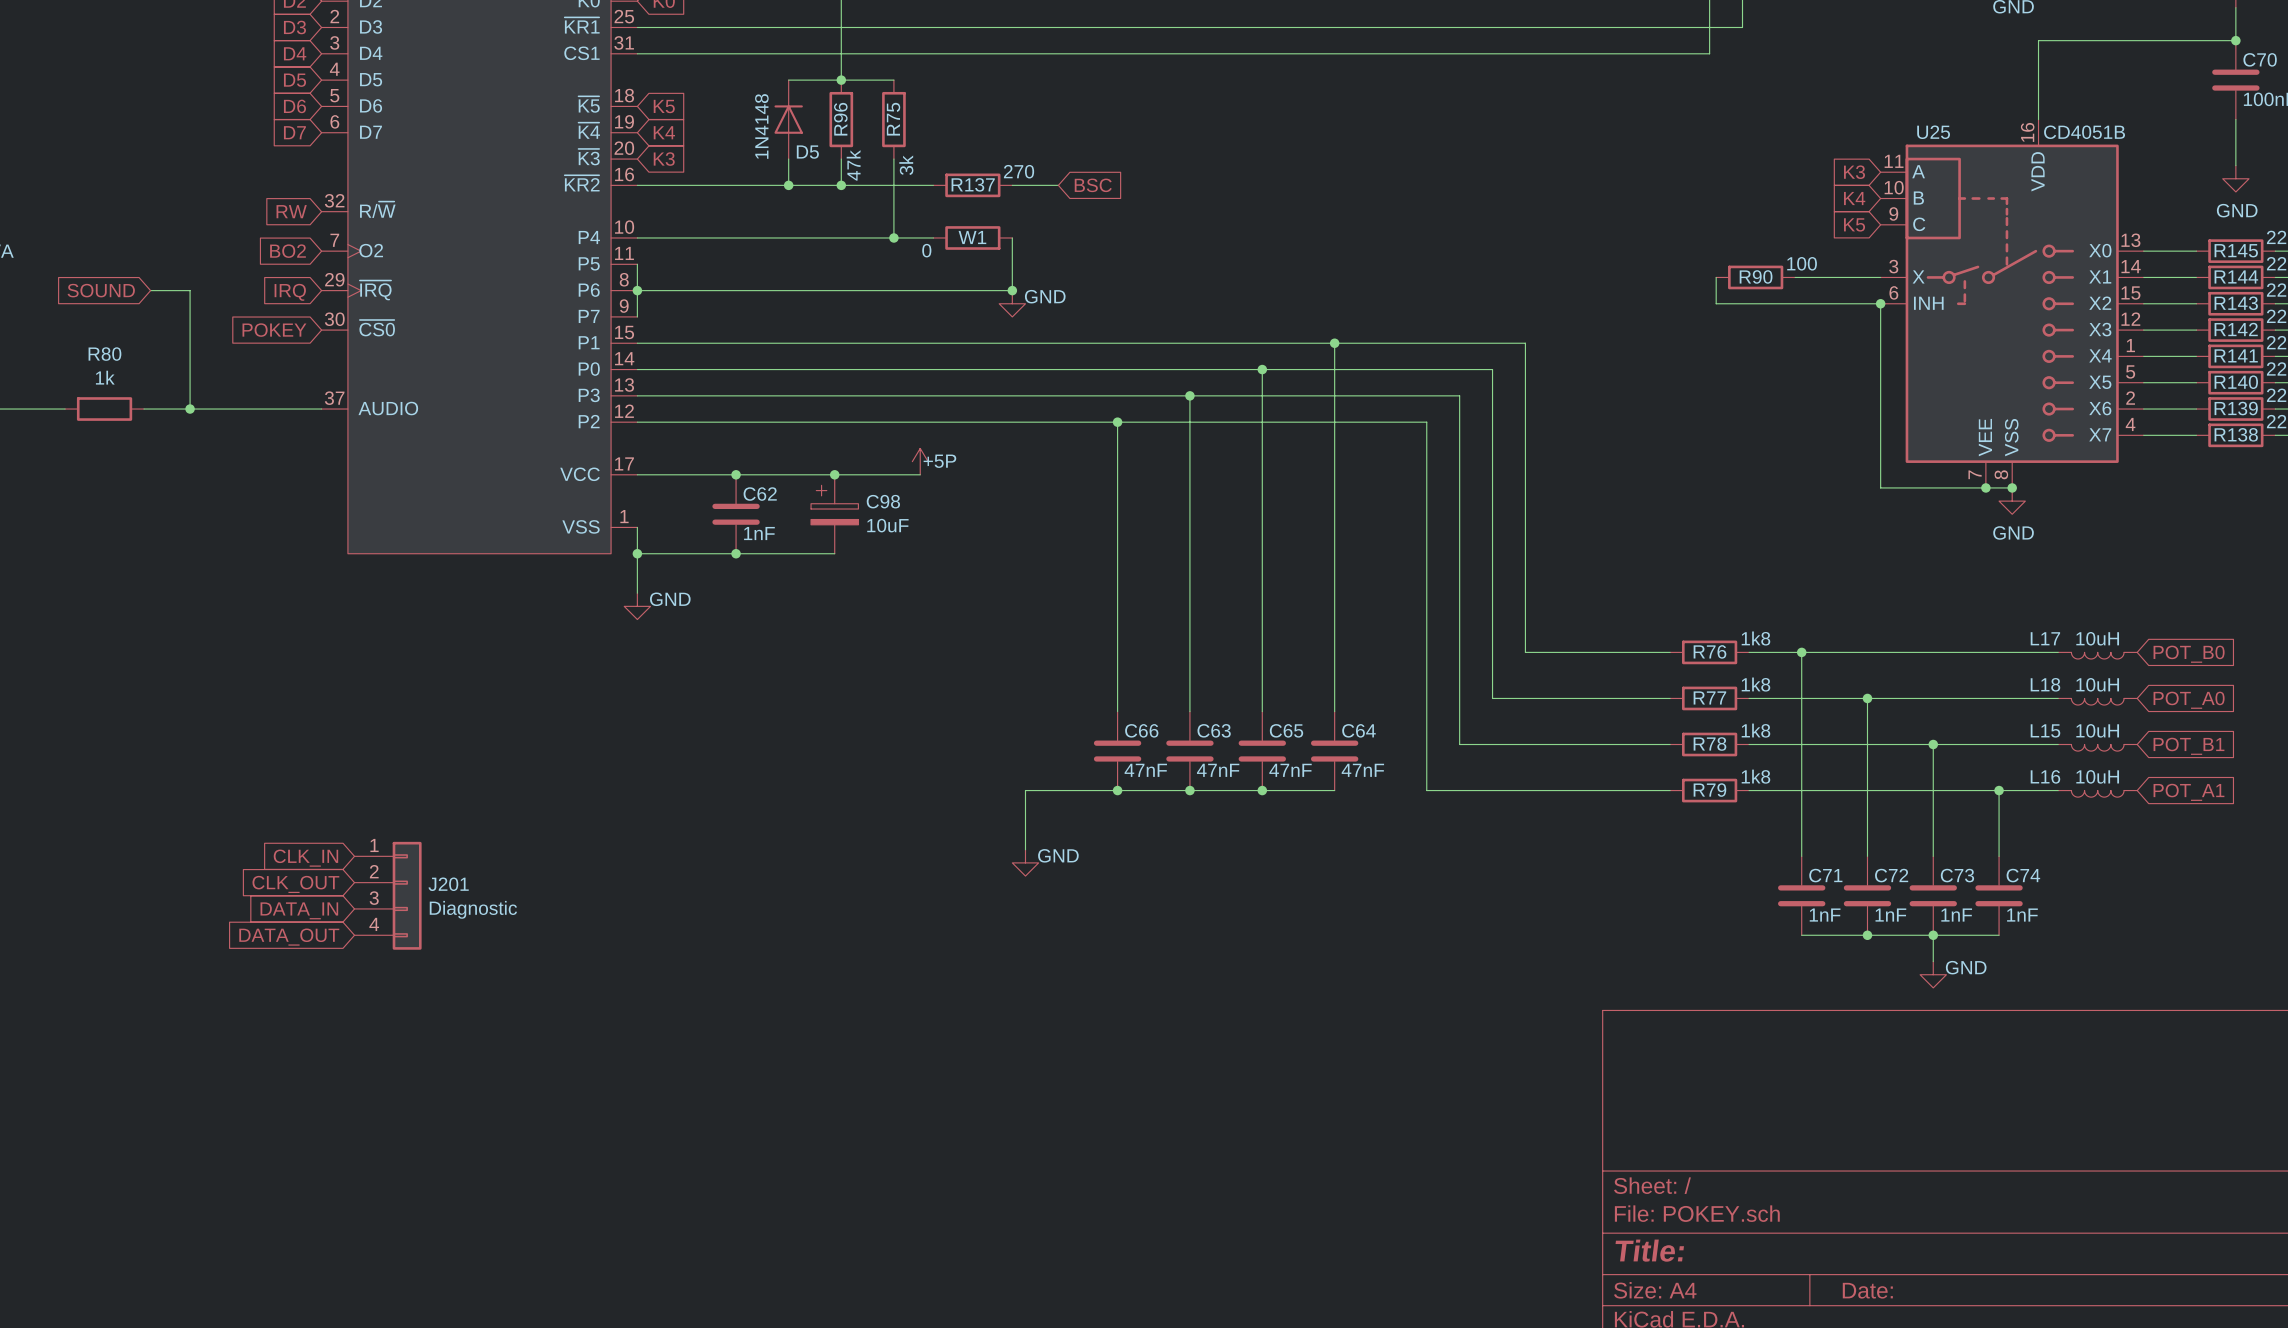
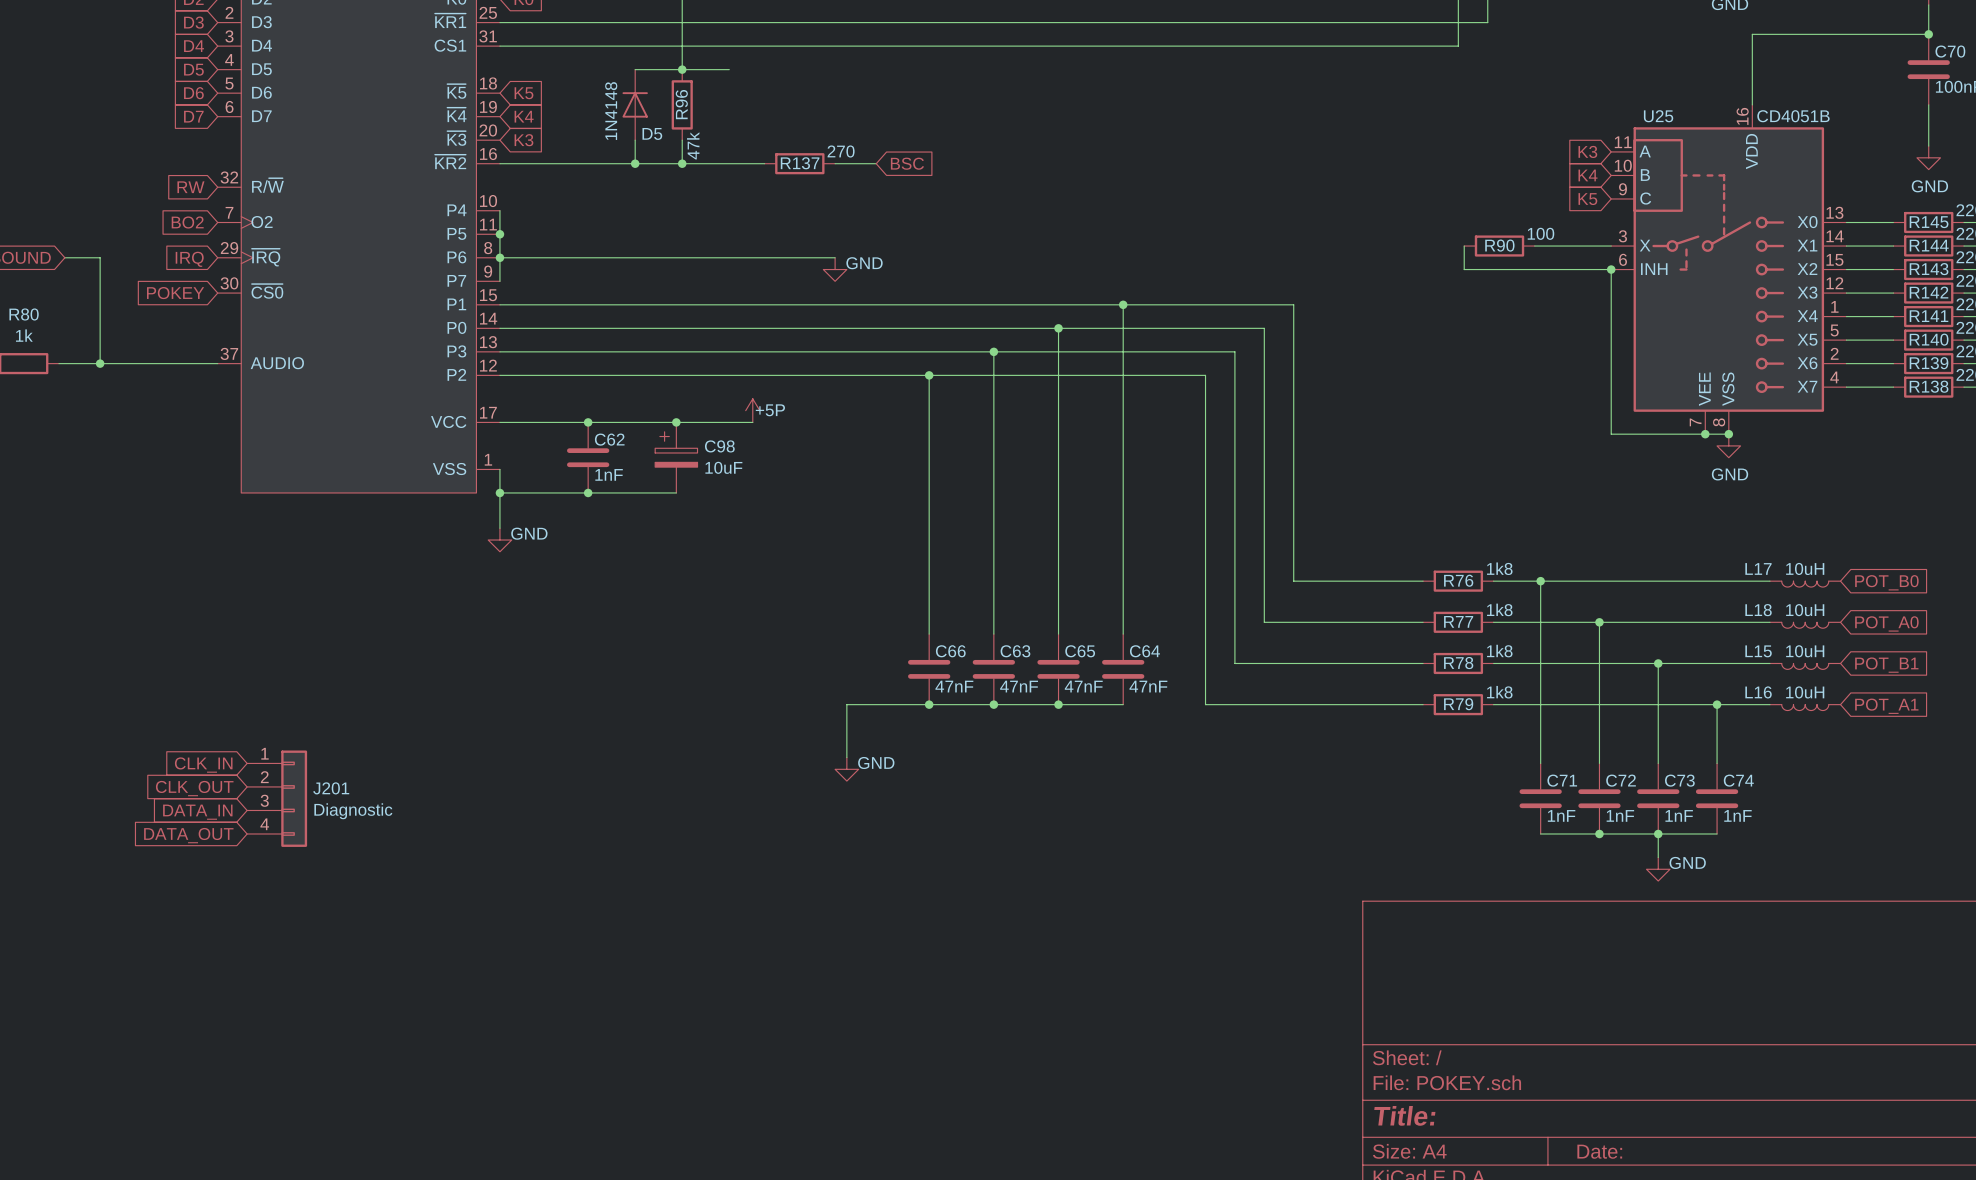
R75: 3k (893, 119) -> none
wire: (893, 159) (893, 237) -> none
wire: (637, 237) (933, 237) -> (499, 210) (499, 234)
junction: (893, 237) -> none
W1: 0 (972, 237) -> none
wire: (1012, 237) (1012, 290) -> none
junction: none -> (499, 234)
junction: (1012, 290) -> none

